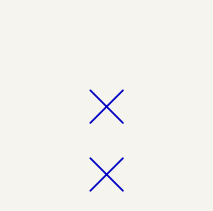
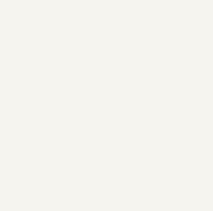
no-connect mark: (106, 106) -> none
no-connect mark: (106, 174) -> none

